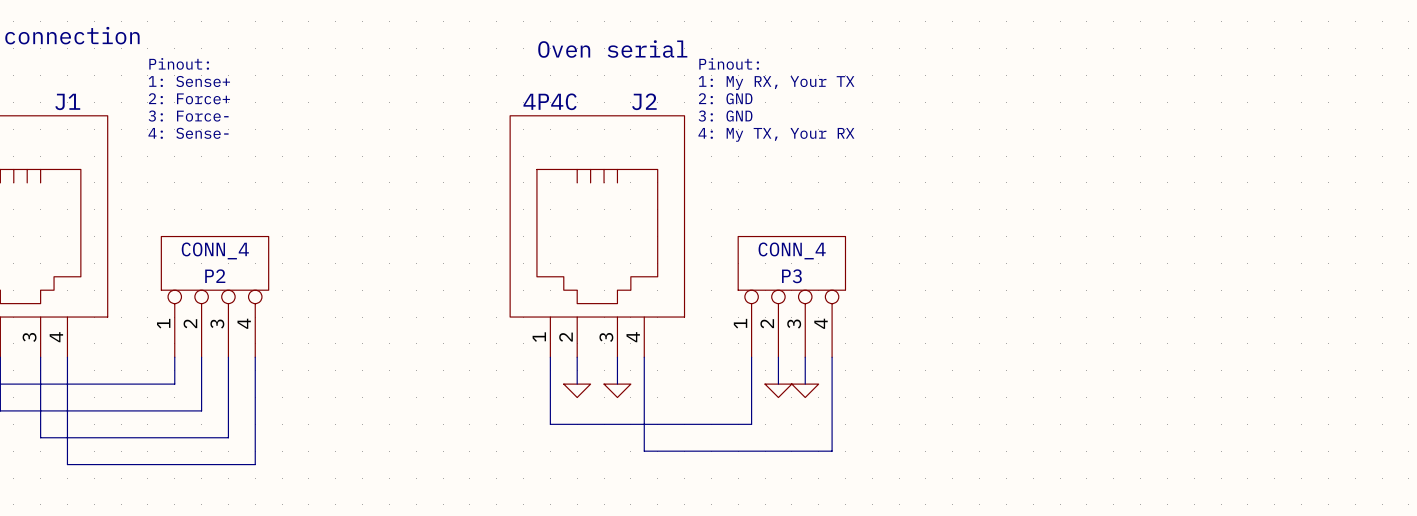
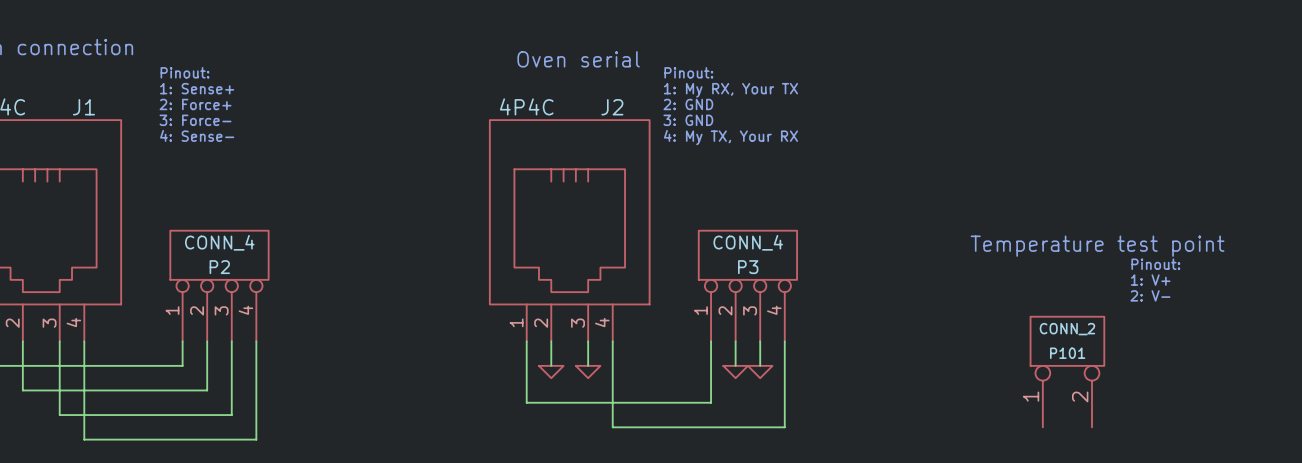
text: none -> Temperature test point (1097, 246)
text: none -> Pinout: (1155, 264)
text: none -> 1: V+ (1150, 280)
text: none -> 2: V- (1150, 295)
P101: none -> CONN_2 (1067, 372)

